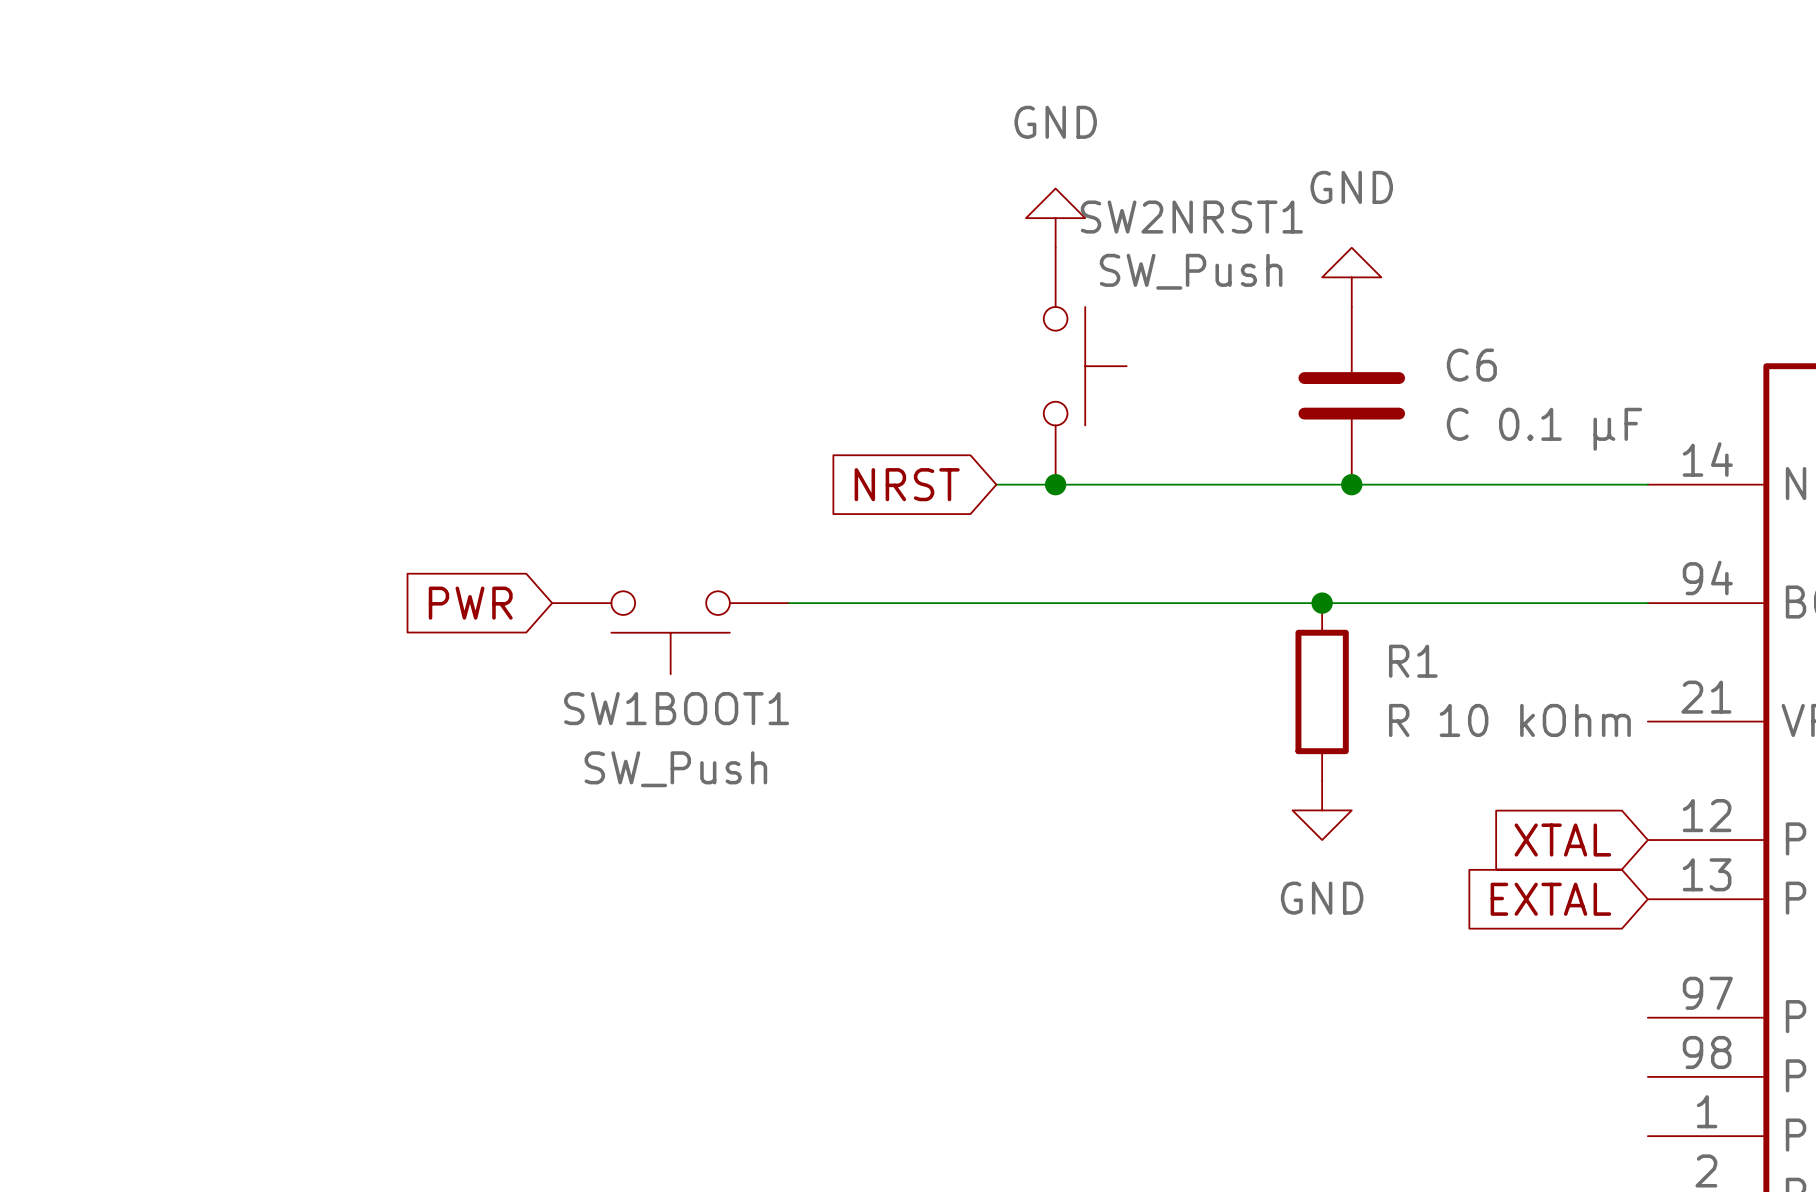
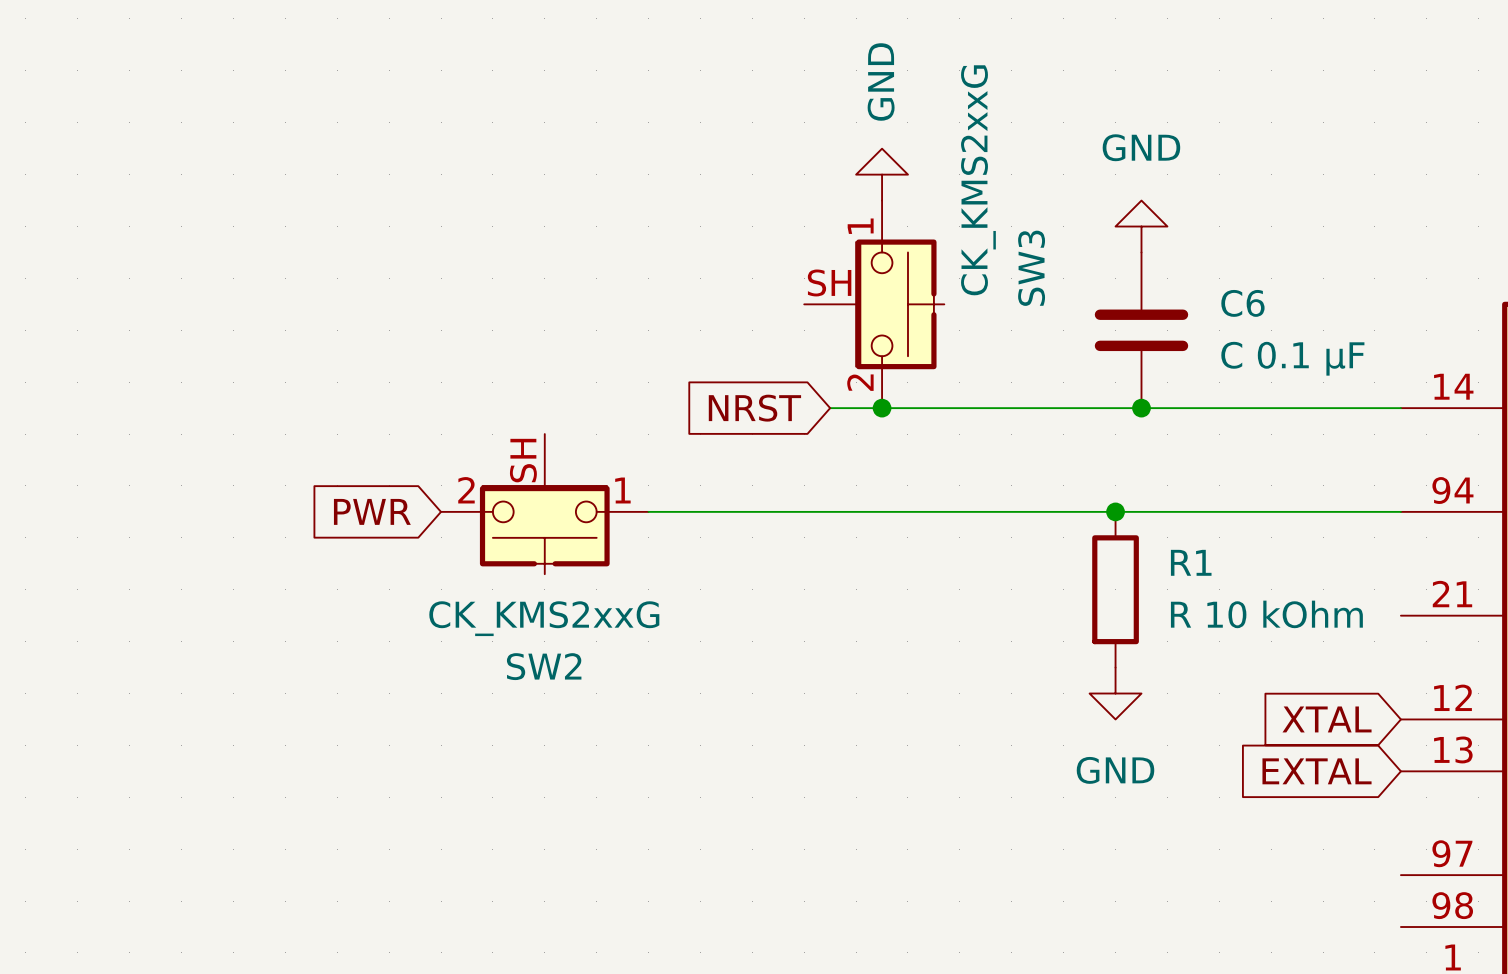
power symbol text rotation: 0° (1055, 122) -> 90° counterclockwise (881, 82)
SW3: none -> CK_KMS2xxG (874, 304)
SW2NRST1: SW_Push (1085, 366) -> none
SW2: none -> CK_KMS2xxG (544, 504)
SW1BOOT1: SW_Push (670, 632) -> none

